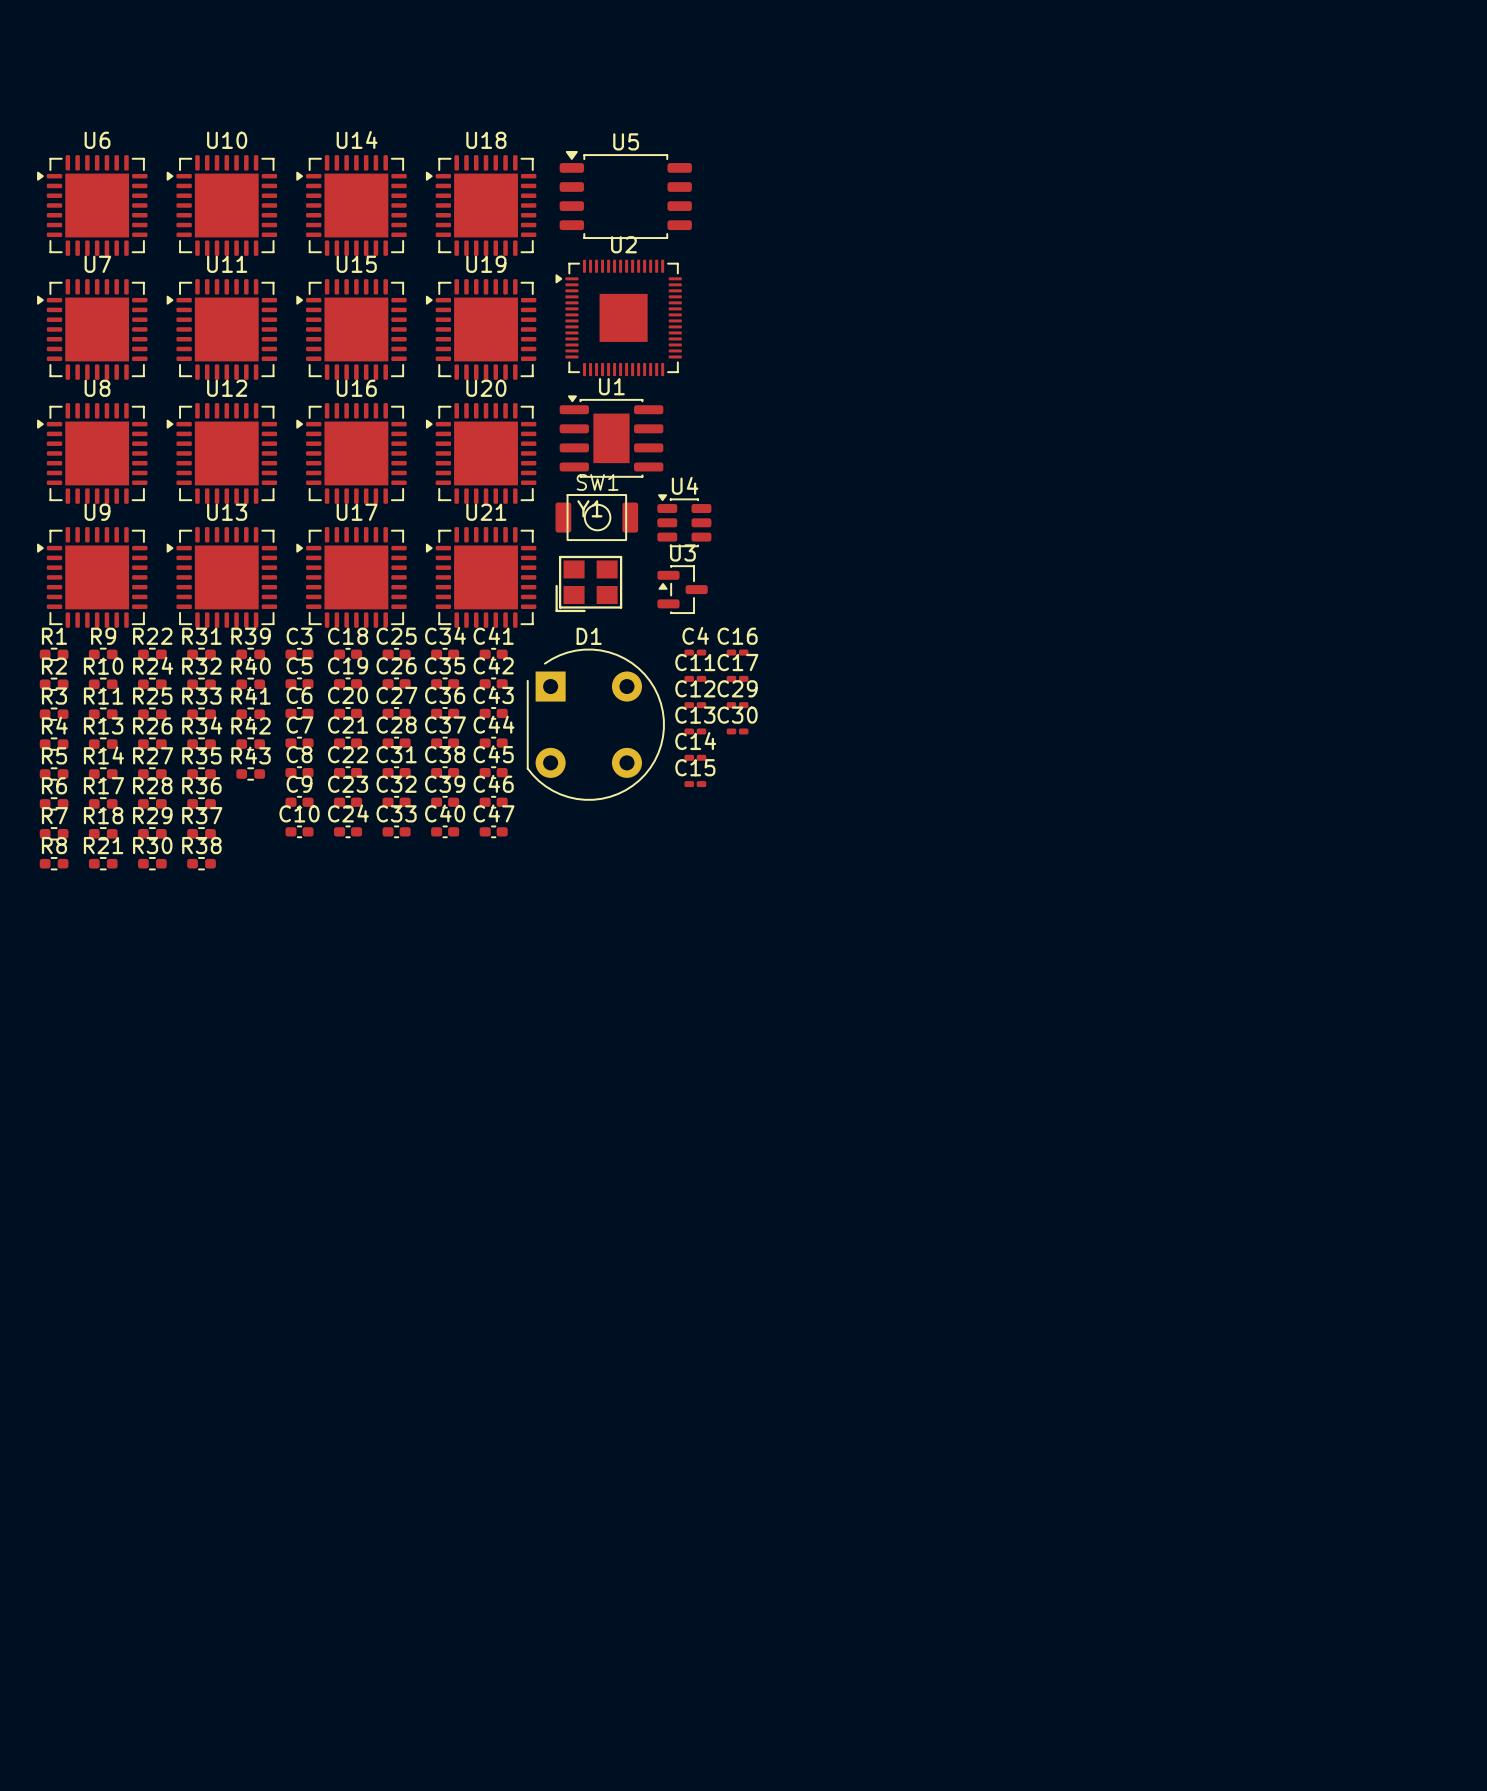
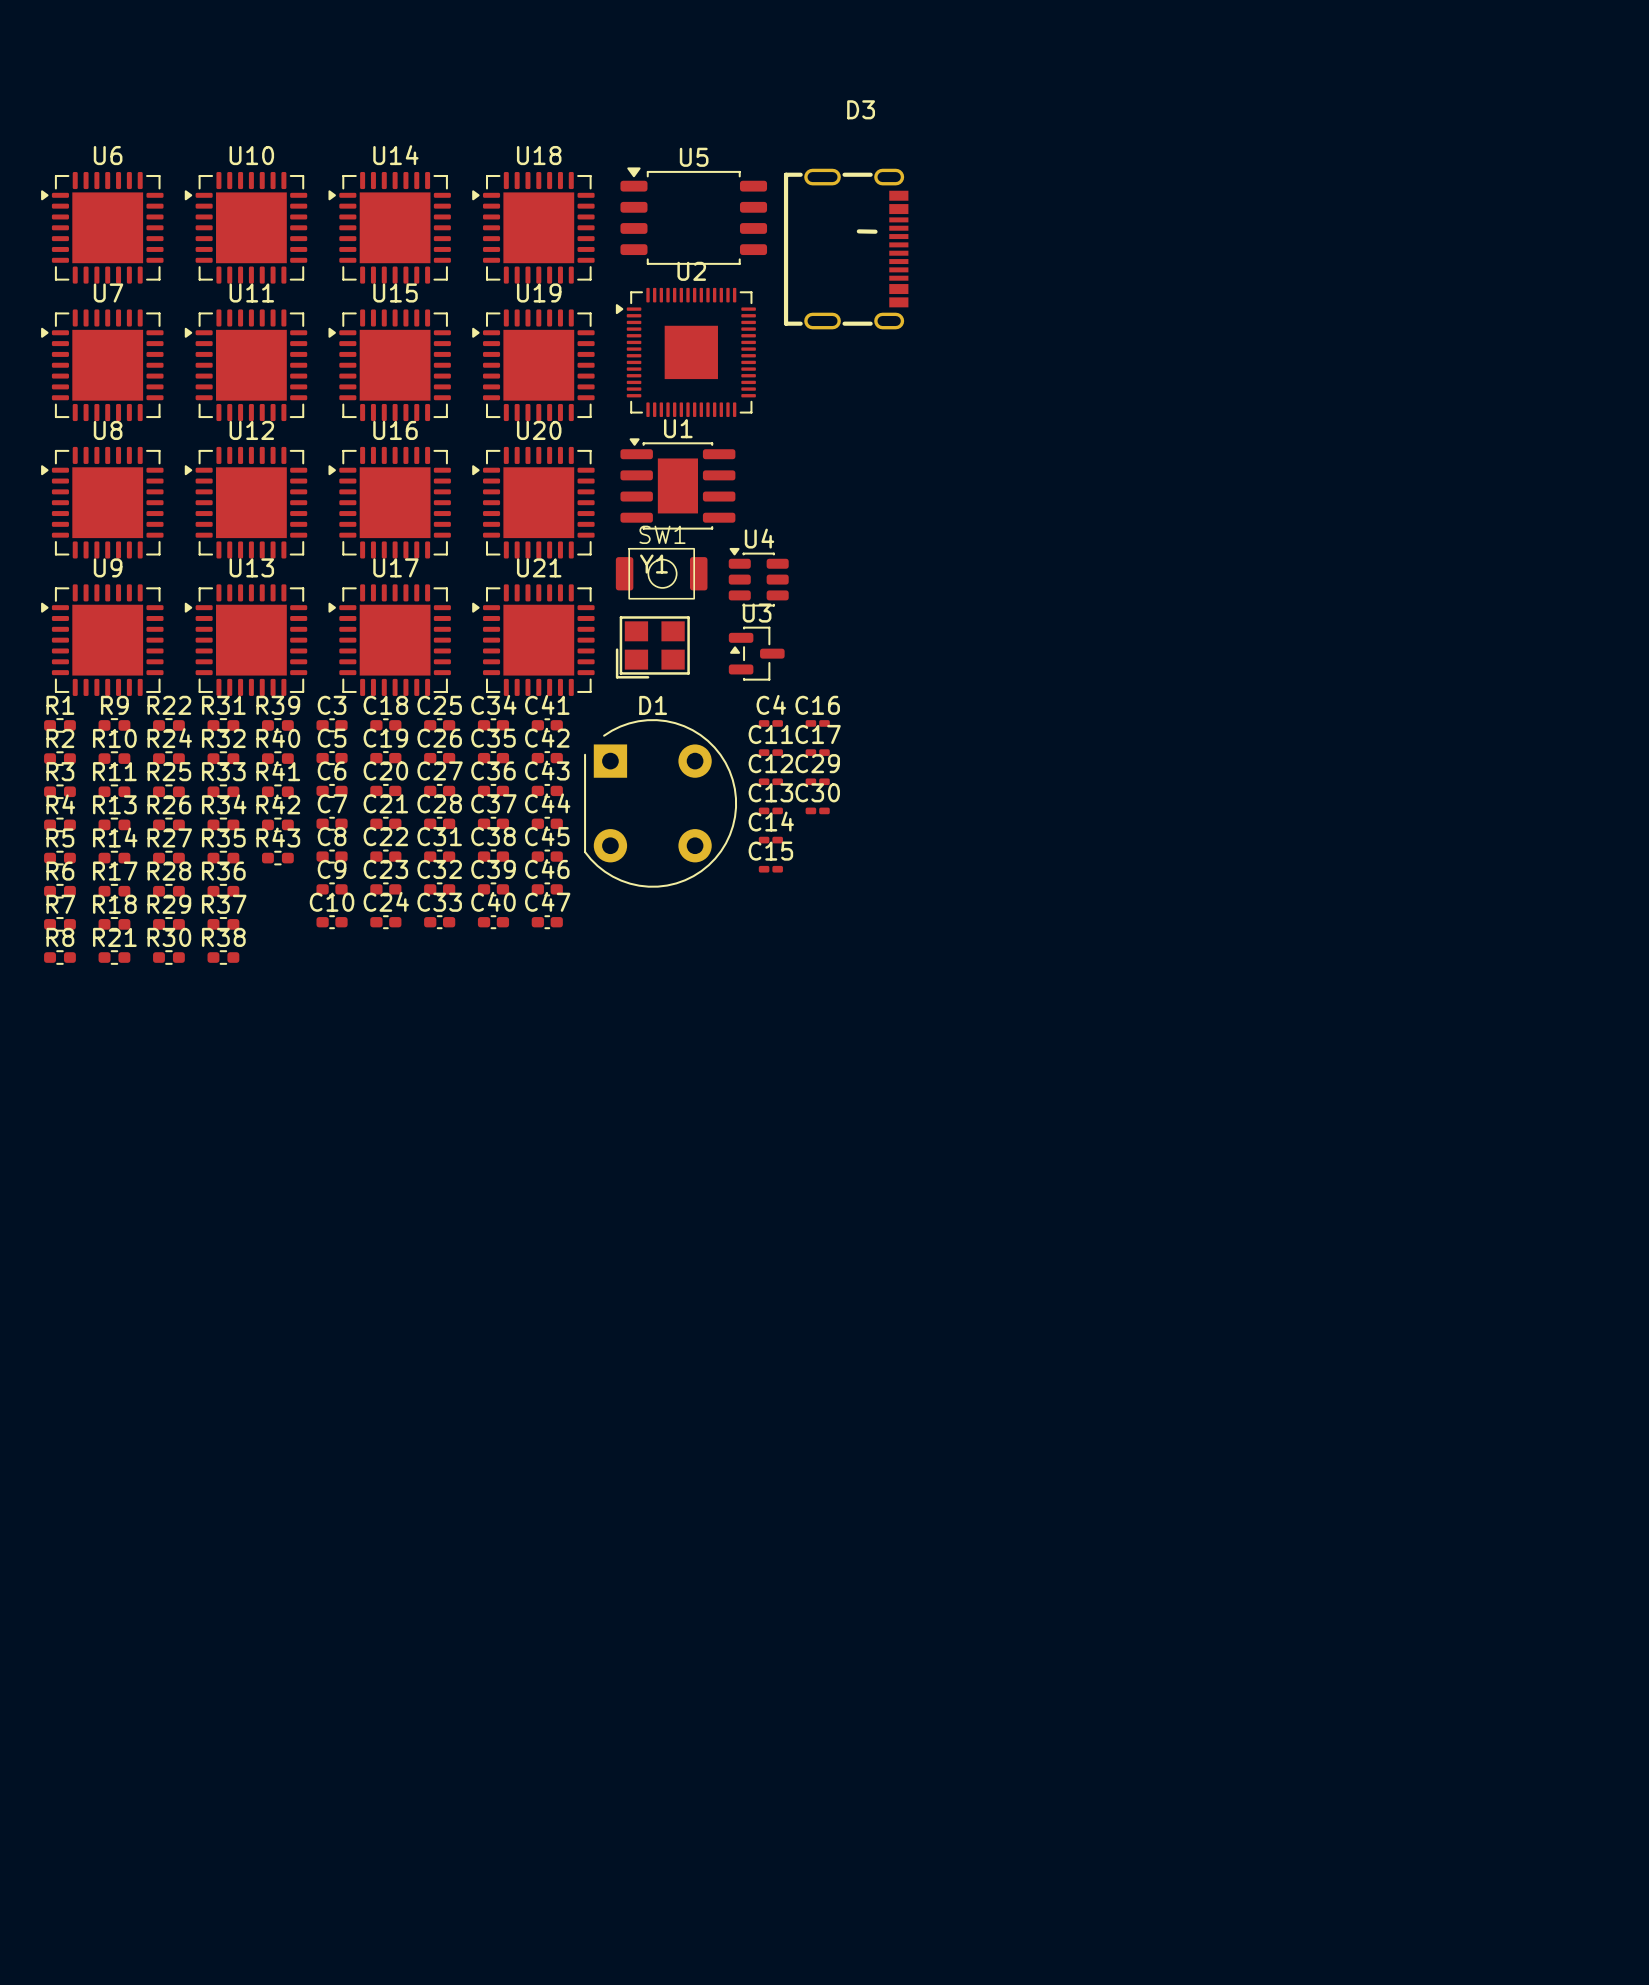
D3: none -> (846, 249)

